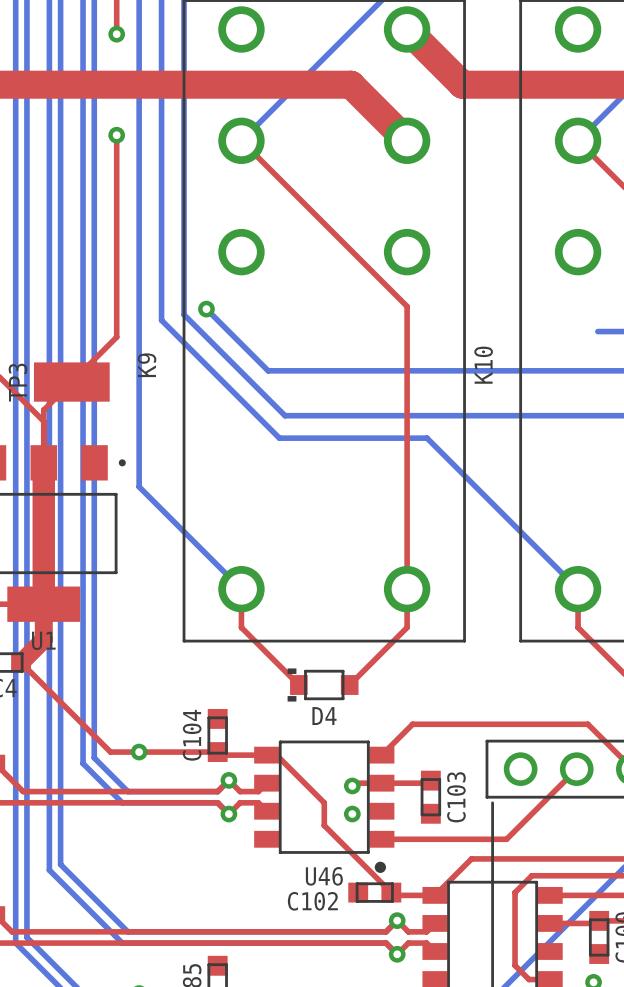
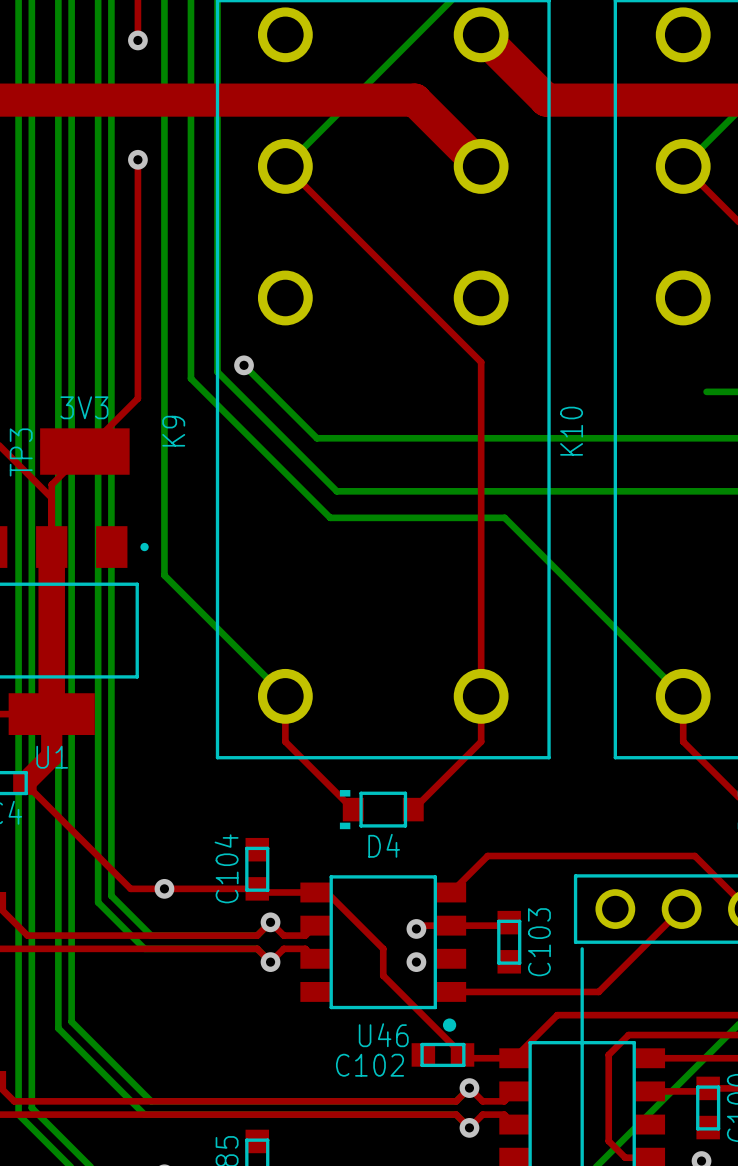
TP3 text: none -> 3V3 (84, 407)

